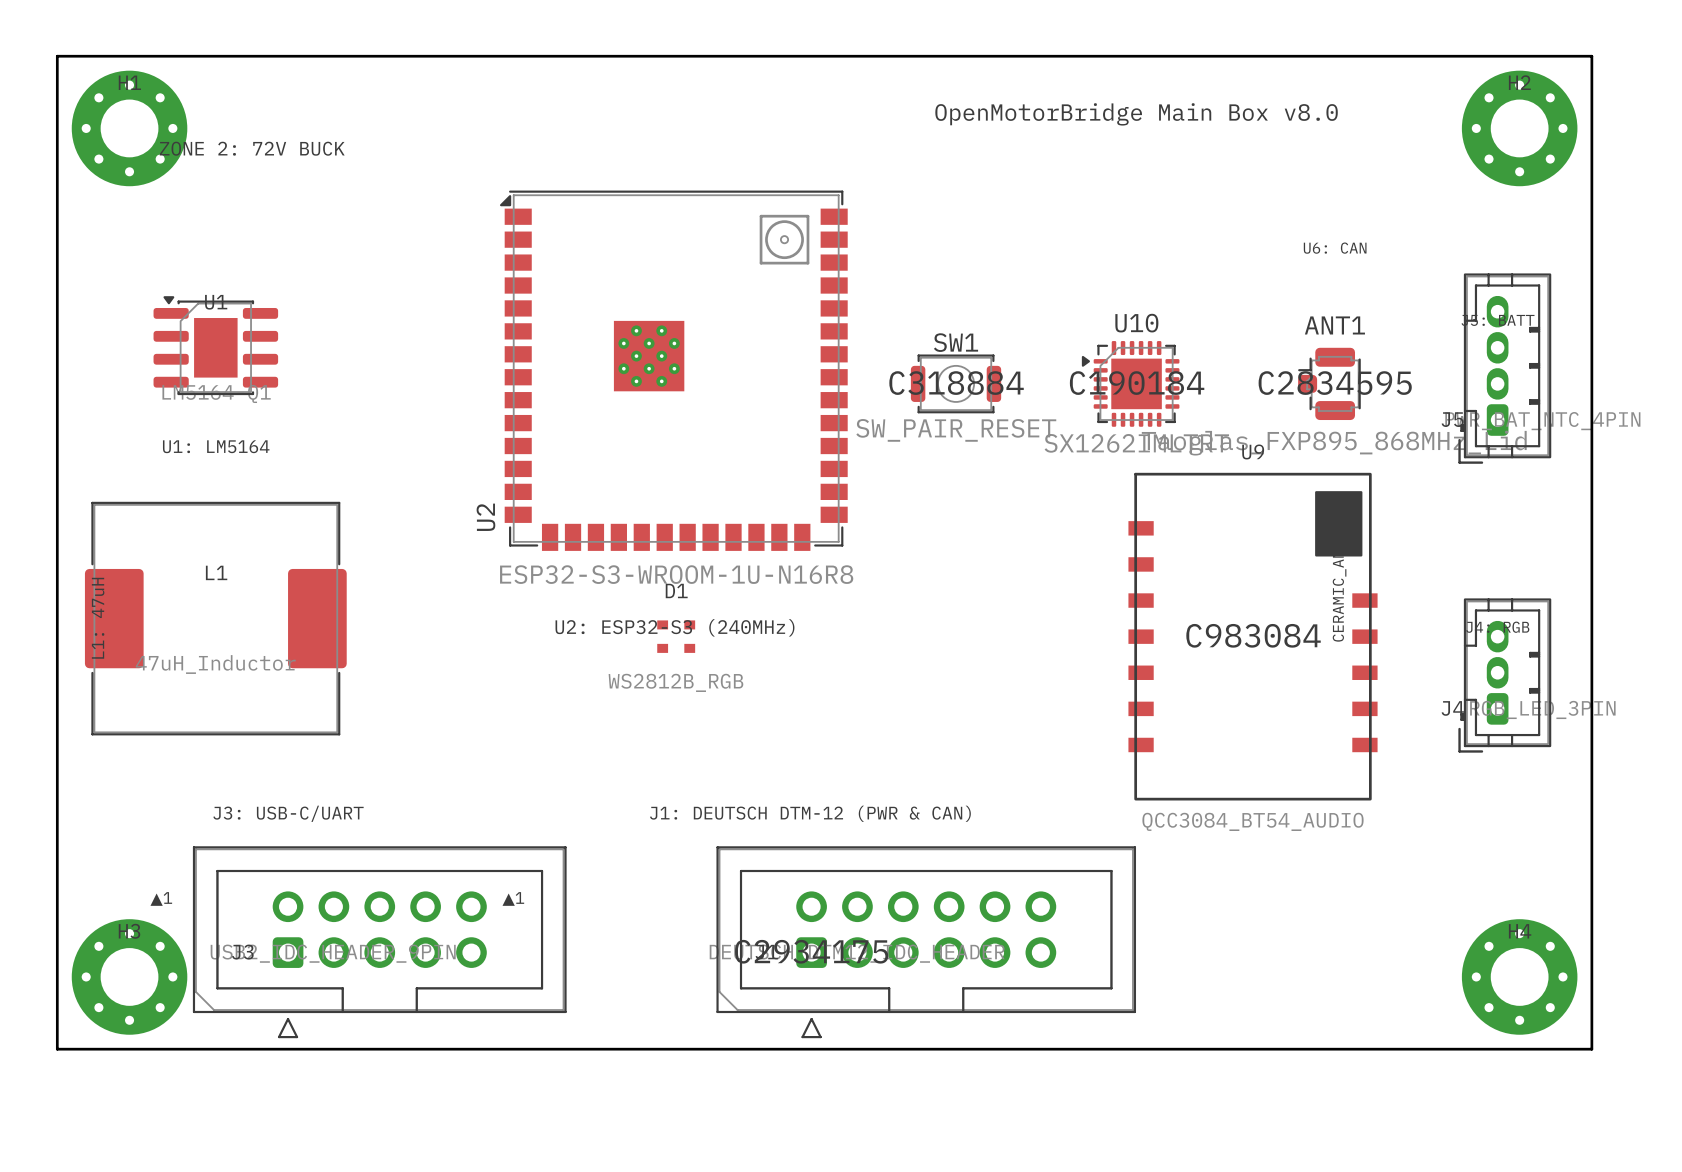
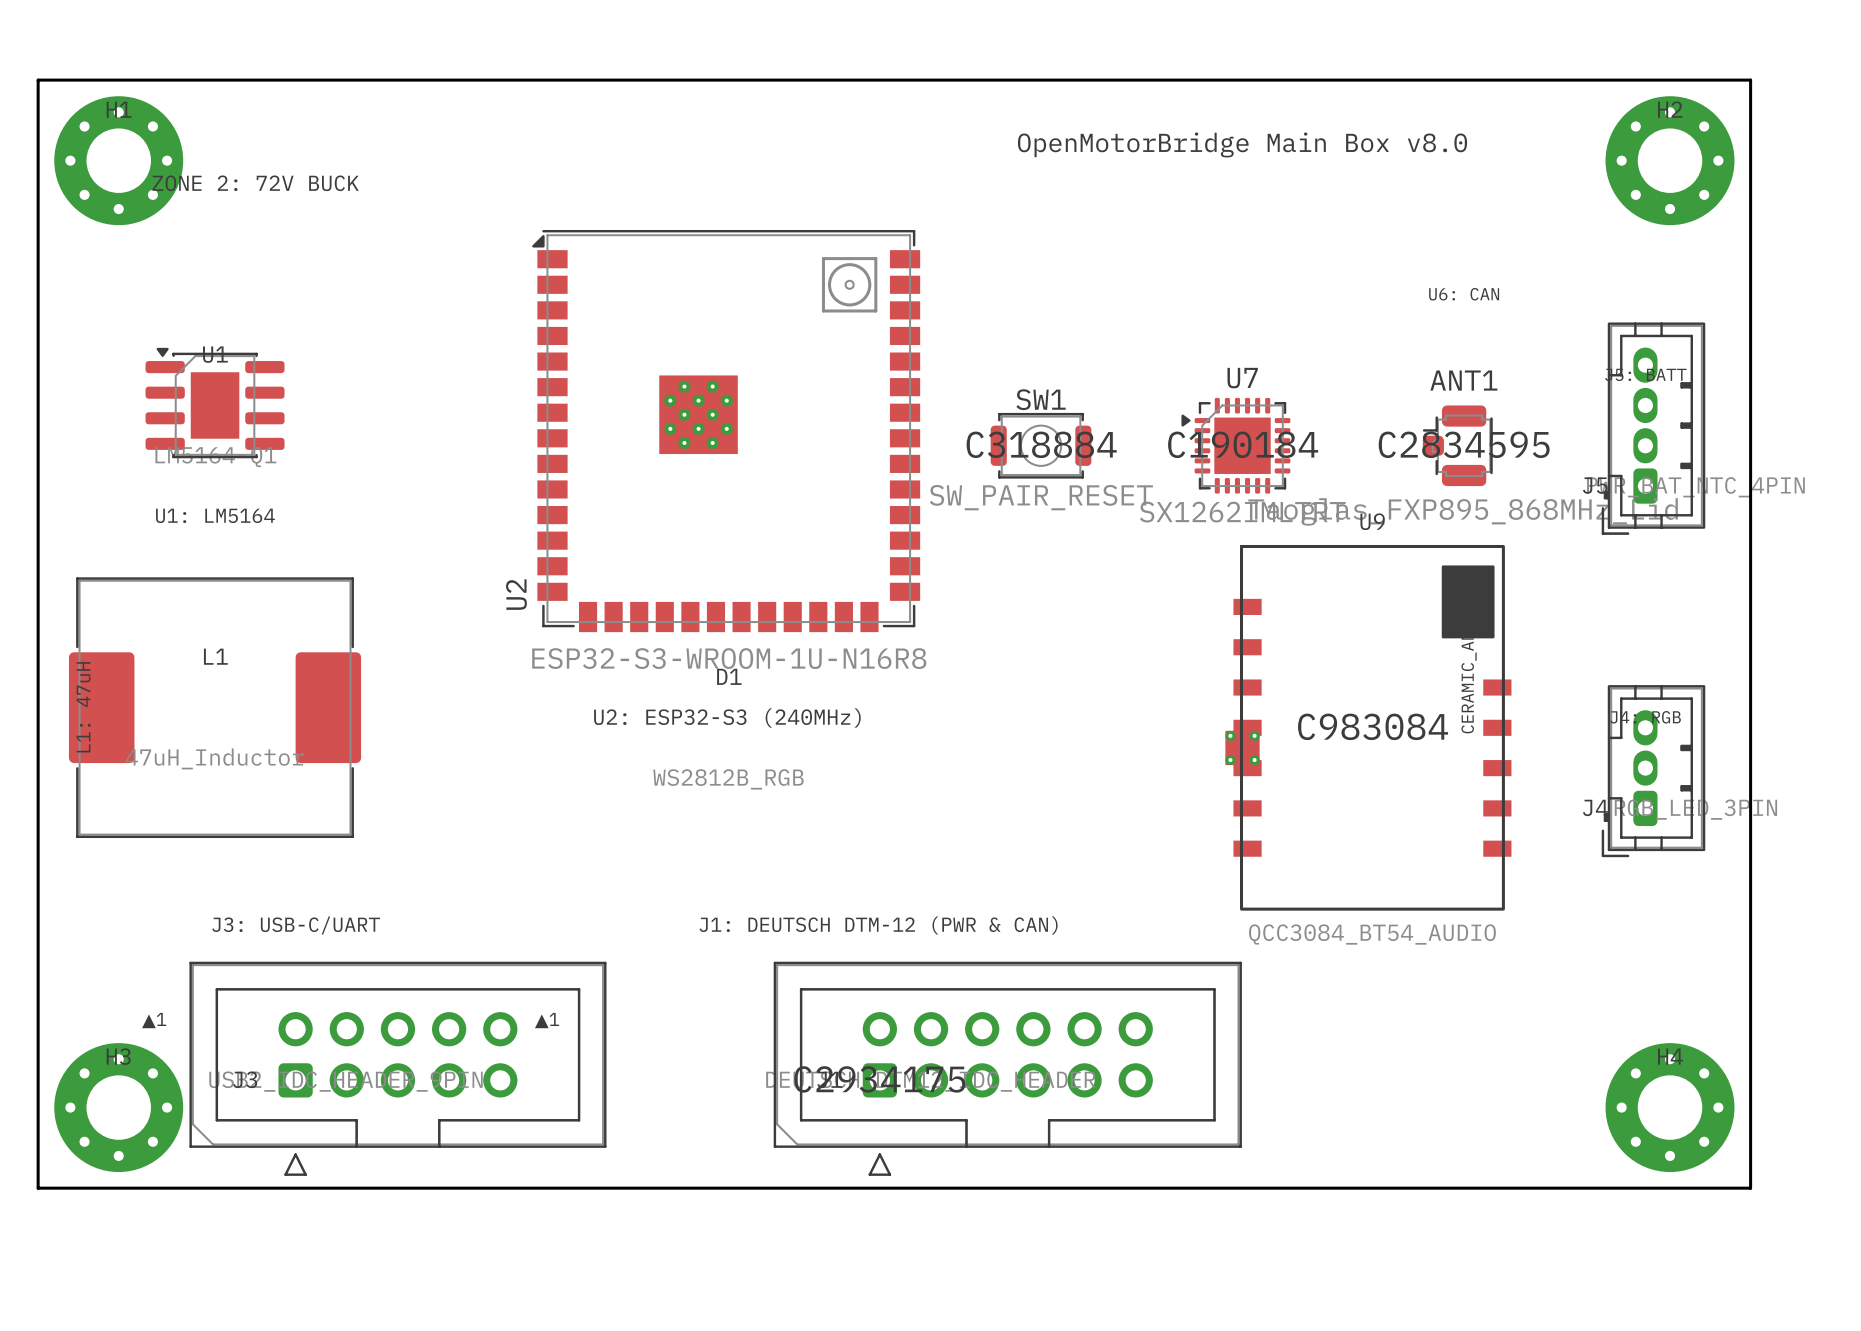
U10 name: U10 (1136, 323) -> U7 (1242, 378)
D1 footprint: [657, 620, 696, 653] -> [653, 668, 804, 790]
part: none -> (1242, 747)

